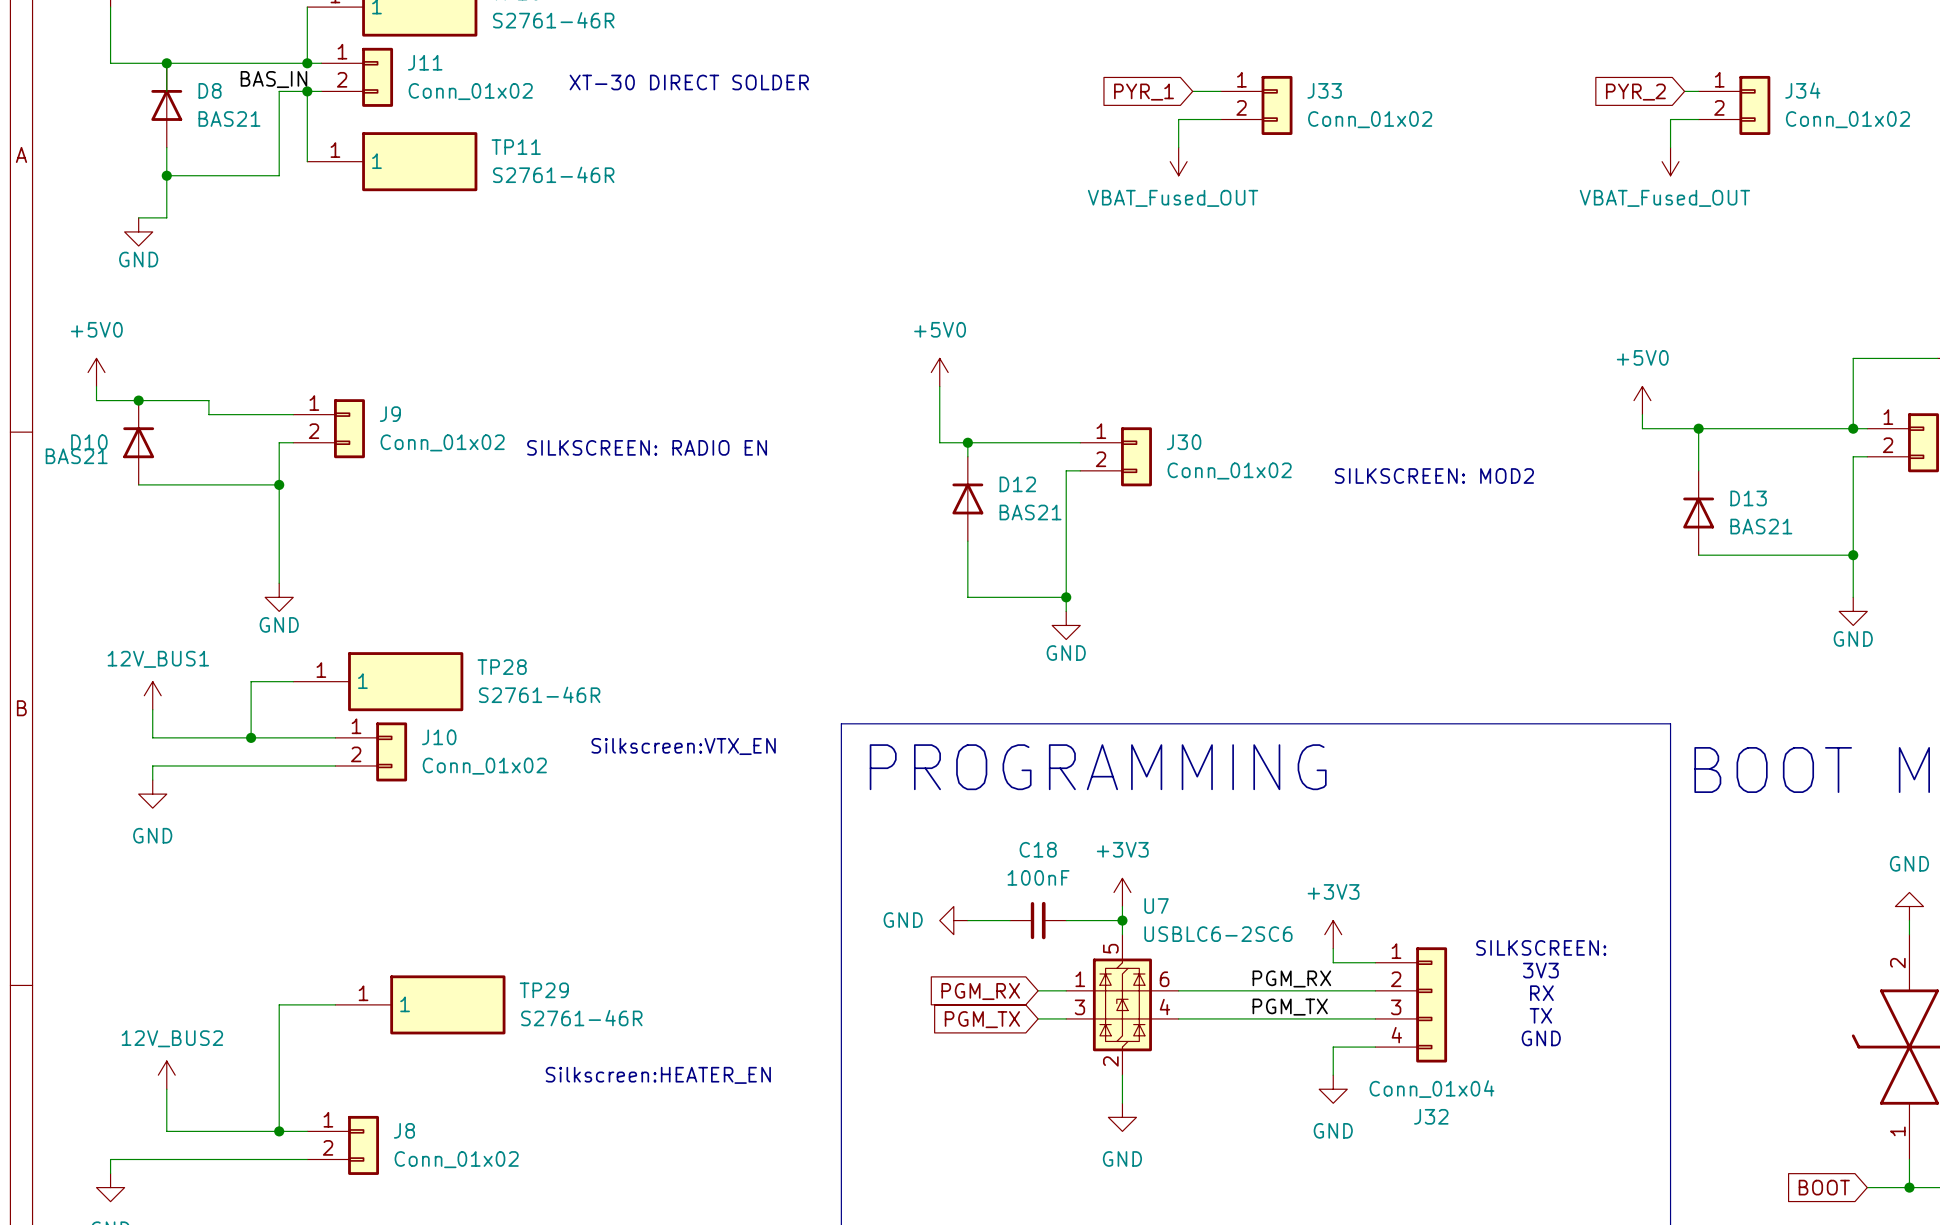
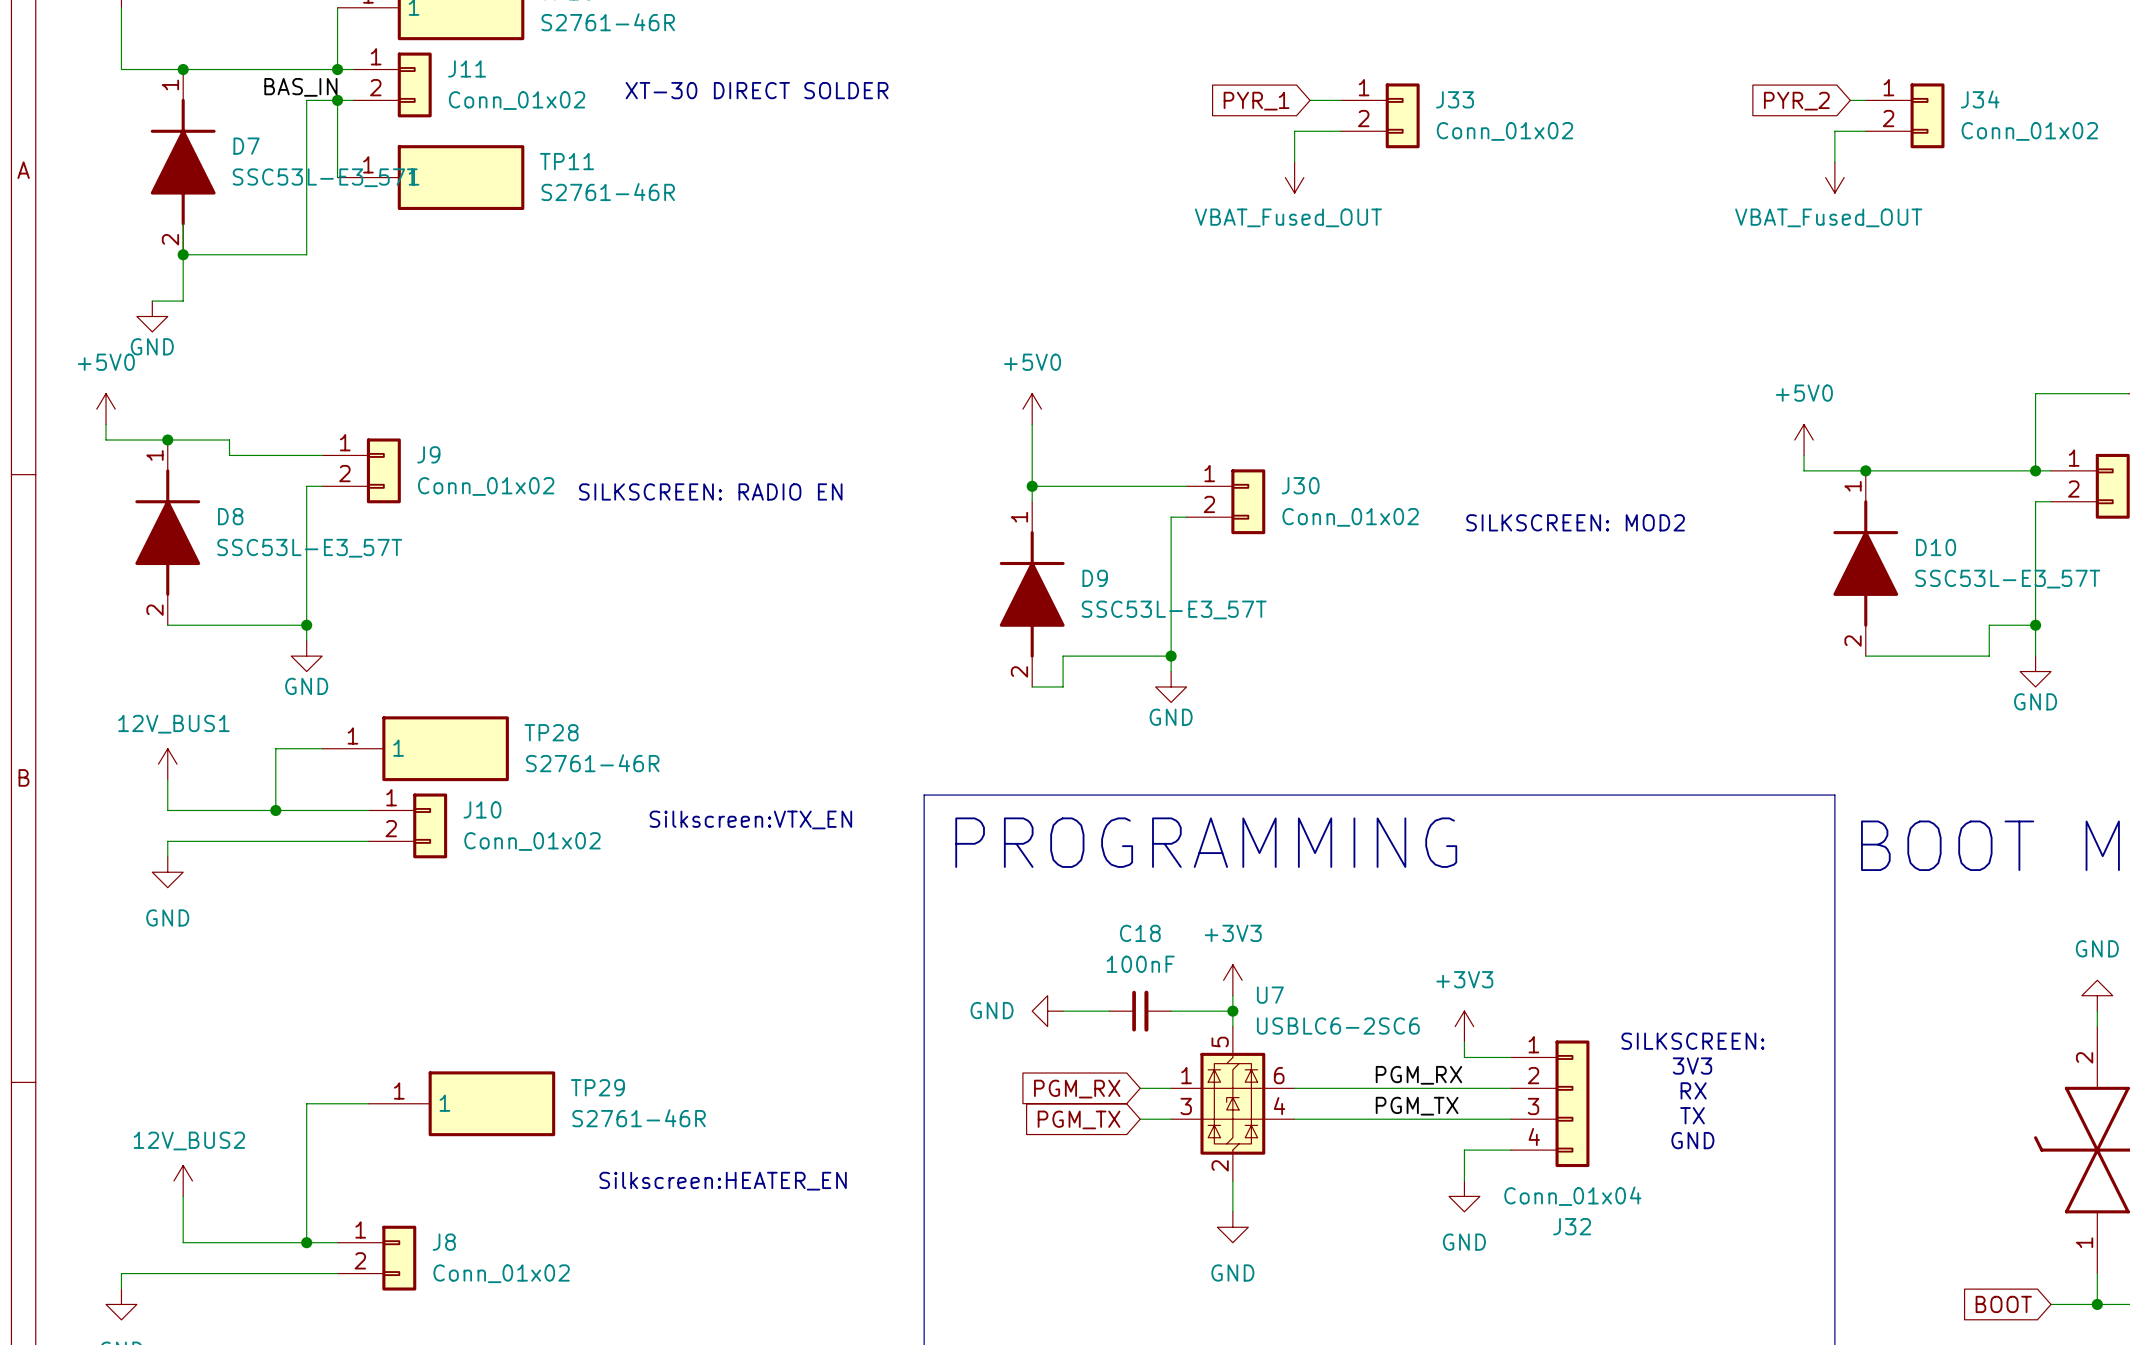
D8 symbol: [151, 63, 183, 148] -> [135, 440, 201, 626]
D8 value: BAS21 (229, 118) -> SSC53L-E3_57T (309, 548)
D7: none -> SSC53L-E3_57T (183, 162)
wire: (166, 175) (279, 175) -> (183, 254) (306, 254) (306, 193)
junction position: (166, 175) -> (183, 254)
wire: (138, 217) (166, 217) -> (152, 301) (183, 301) (183, 239)
power symbol position: GND (138, 231) -> GND (152, 316)
D10 symbol: [123, 400, 155, 485] -> [1833, 470, 1899, 657]
junction position: (138, 400) -> (167, 440)
D10 name position: D10 (89, 442) -> D10 (1936, 547)
wire: (967, 442) (967, 456) -> (1032, 486) (1032, 501)
junction position: (967, 442) -> (1032, 486)
D10 value: BAS21 (76, 456) -> SSC53L-E3_57T (2007, 579)
wire: (138, 484) (279, 484) -> none
junction: (279, 484) -> none
D12: BAS21 (967, 498) -> none
D13: BAS21 (1698, 513) -> none
D9: none -> SSC53L-E3_57T (1032, 594)
wire: (967, 541) (967, 597) -> (1032, 686) (1063, 686) (1063, 656)
wire: (1698, 555) (1853, 555) -> none
junction position: (1853, 555) -> (2035, 625)
wire: none -> (167, 625) (306, 625)
junction: none -> (306, 625)
wire: none -> (2035, 625) (1989, 625) (1989, 656) (1865, 656)

